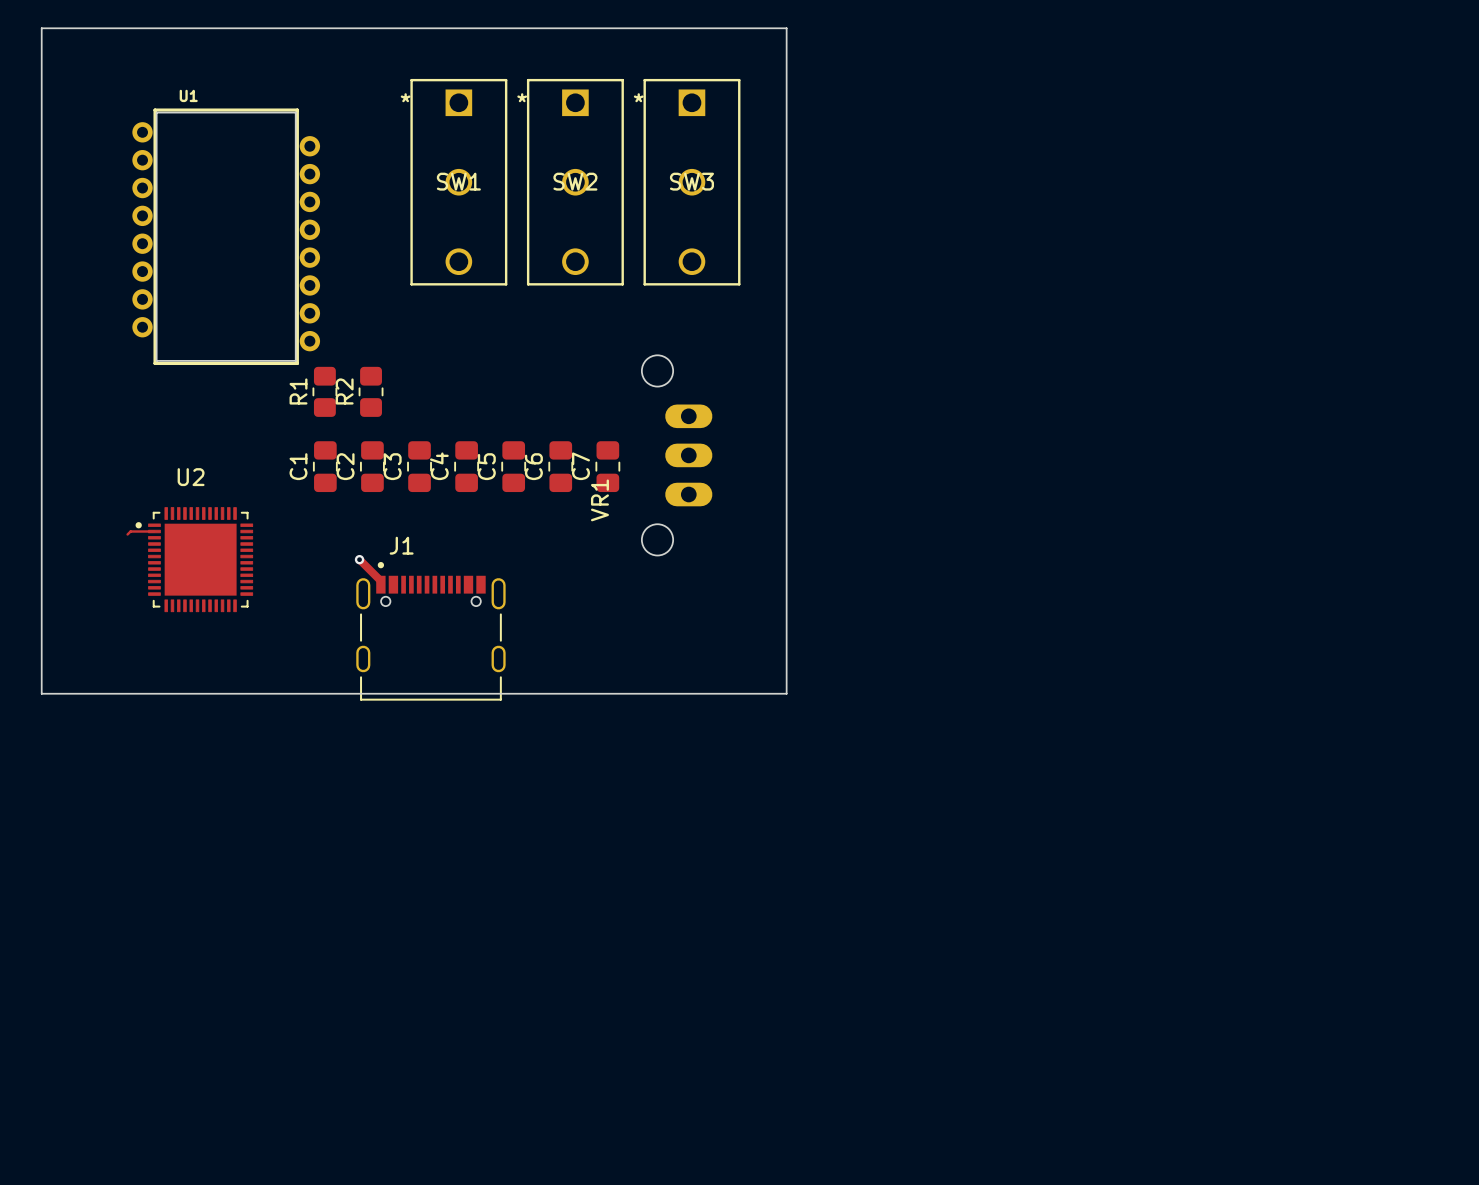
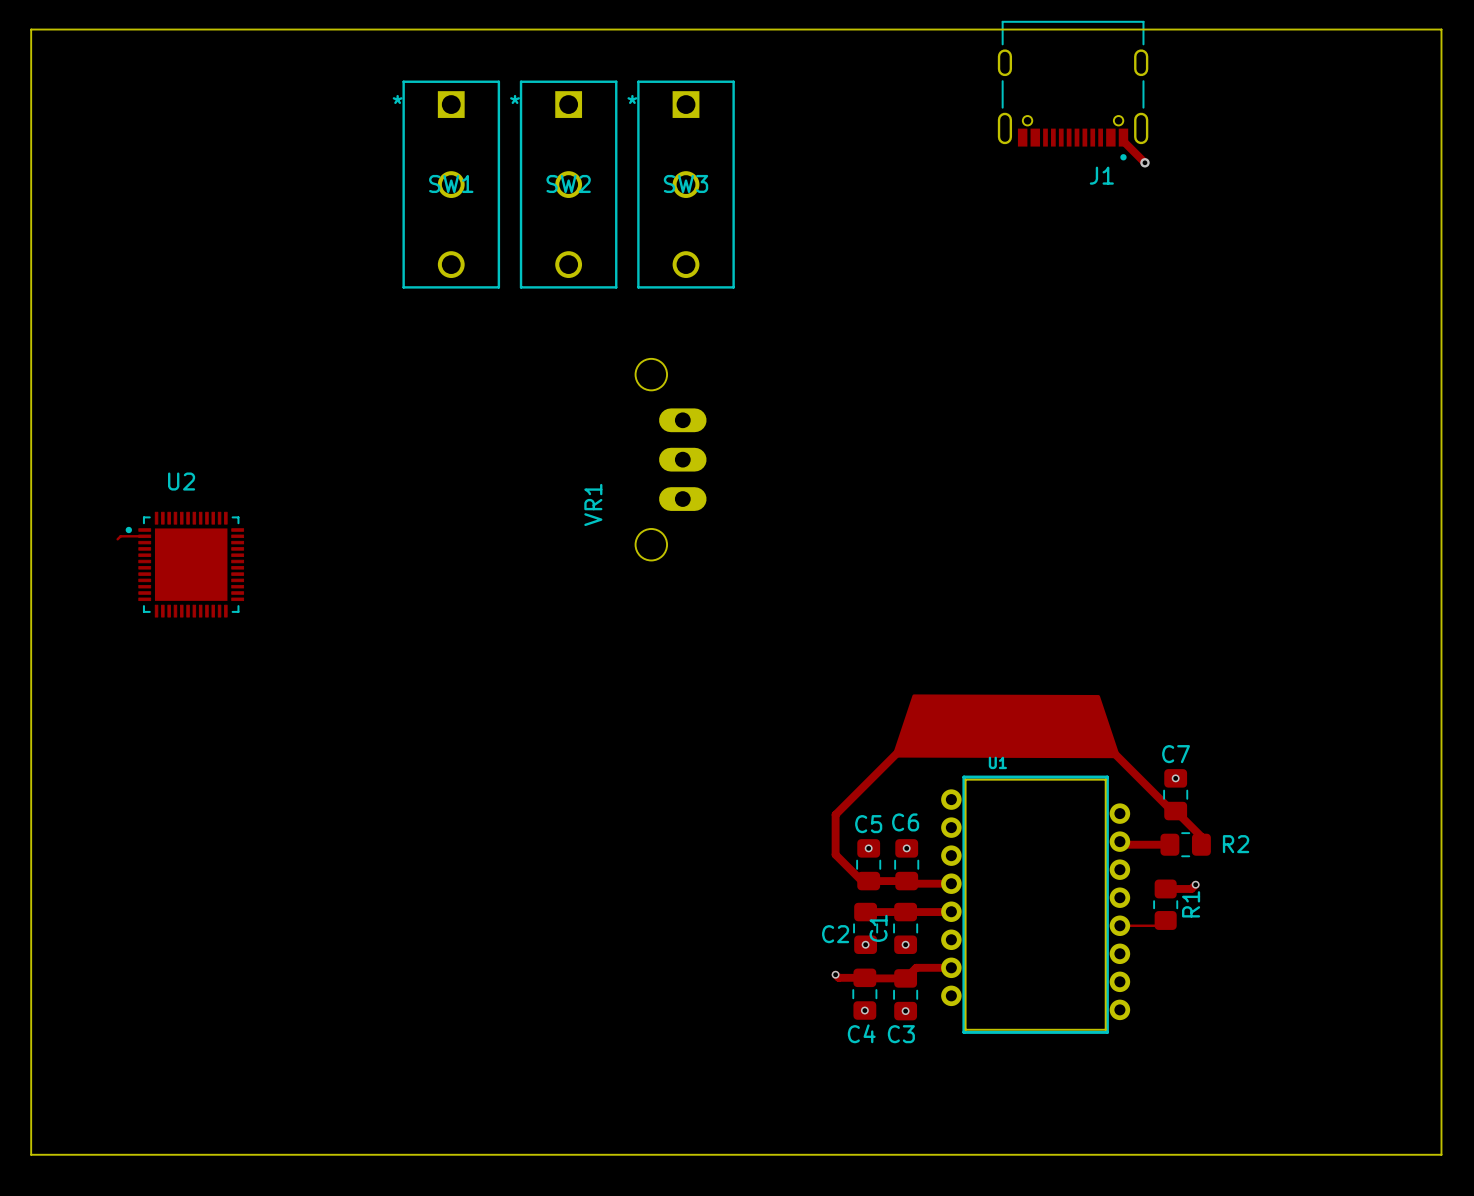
board edge: (786, 28) (786, 693) (41, 693) -> (781, 29) (1441, 29) (1441, 1154) (31, 1154) (31, 699)
top track: none -> (1123, 141) (1144, 162)
via: none -> (1144, 162)
U1 position: (226, 236) -> (1035, 904)
R1 name position: R1 (298, 391) -> R1 (1191, 904)
R1 position: (324, 391) -> (1165, 904)
R2 name position: R2 (344, 391) -> R2 (1236, 844)
R2 rotation: 0° (371, 391) -> 90° clockwise (1185, 844)
R2 position: (371, 391) -> (1185, 844)
C1 position: (325, 466) -> (905, 928)
C2 name rotation: 0° (345, 466) -> 90° clockwise (835, 934)
C2 position: (372, 466) -> (865, 928)
C3 name rotation: 0° (392, 466) -> 90° clockwise (901, 1034)
C3 name position: C3 (392, 466) -> C3 (901, 1034)
C3 position: (419, 466) -> (905, 994)
C4 name rotation: 0° (439, 466) -> 90° clockwise (861, 1033)
C4 name position: C4 (439, 466) -> C4 (861, 1033)
C4 position: (466, 466) -> (864, 994)
C5 name rotation: 0° (486, 466) -> 90° clockwise (868, 824)
C5 name position: C5 (486, 466) -> C5 (868, 824)
C5 position: (513, 466) -> (868, 864)
C6 name rotation: 0° (533, 466) -> 90° clockwise (905, 822)
C6 name position: C6 (533, 466) -> C6 (905, 822)
C6 position: (560, 466) -> (906, 864)
C7 name rotation: 0° (580, 466) -> 90° clockwise (1176, 754)
C7 name position: C7 (580, 466) -> C7 (1176, 754)
C7 position: (607, 466) -> (1175, 794)
top track: (359, 559) (380, 581) (380, 584) -> none
via: (359, 559) -> none
J1 rotation: 0° (430, 631) -> 180° (1073, 90)
J1 position: (430, 631) -> (1073, 90)
drawing: none -> [892, 694, 1121, 759]
via: none -> (1175, 778)
top track: none -> (1119, 841) (1122, 844) (1169, 844)
top track: none -> (1201, 844) (1201, 836) (1175, 811) (1172, 811) (1090, 729) (920, 729) (835, 814) (835, 854) (861, 881) (906, 881)
via: none -> (868, 848)
via: none -> (906, 848)
top track: none -> (917, 883) (951, 883)
top track: none -> (1195, 884) (1191, 888) (1165, 888)
via: none -> (1195, 884)
top track: none -> (951, 911) (871, 912)
top track: none -> (1165, 920) (1160, 925) (1119, 925)
via: none -> (865, 944)
via: none -> (905, 944)
top track: none -> (951, 967) (916, 967) (905, 978) (838, 977) (835, 974)
via: none -> (835, 974)
via: none -> (864, 1010)
via: none -> (905, 1011)

